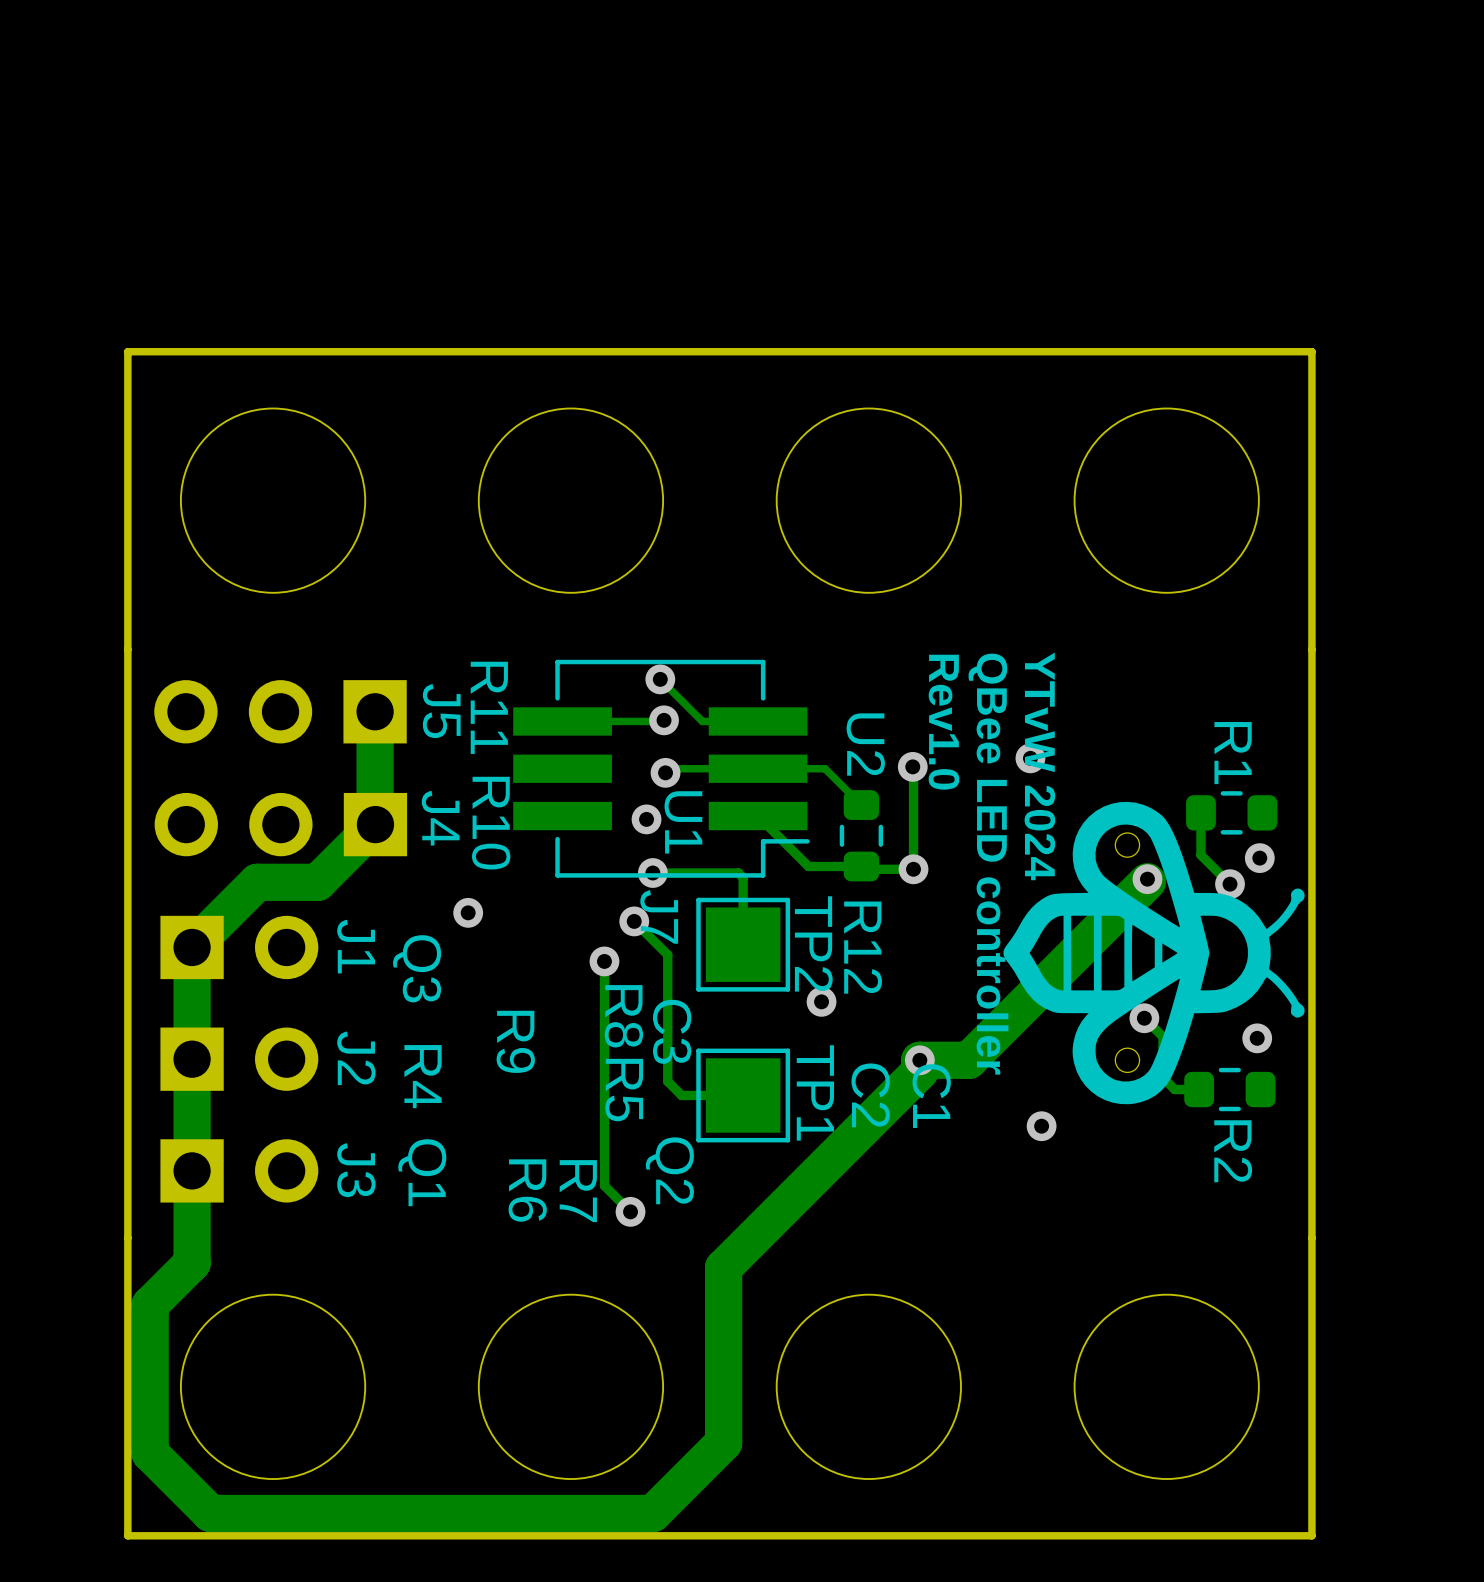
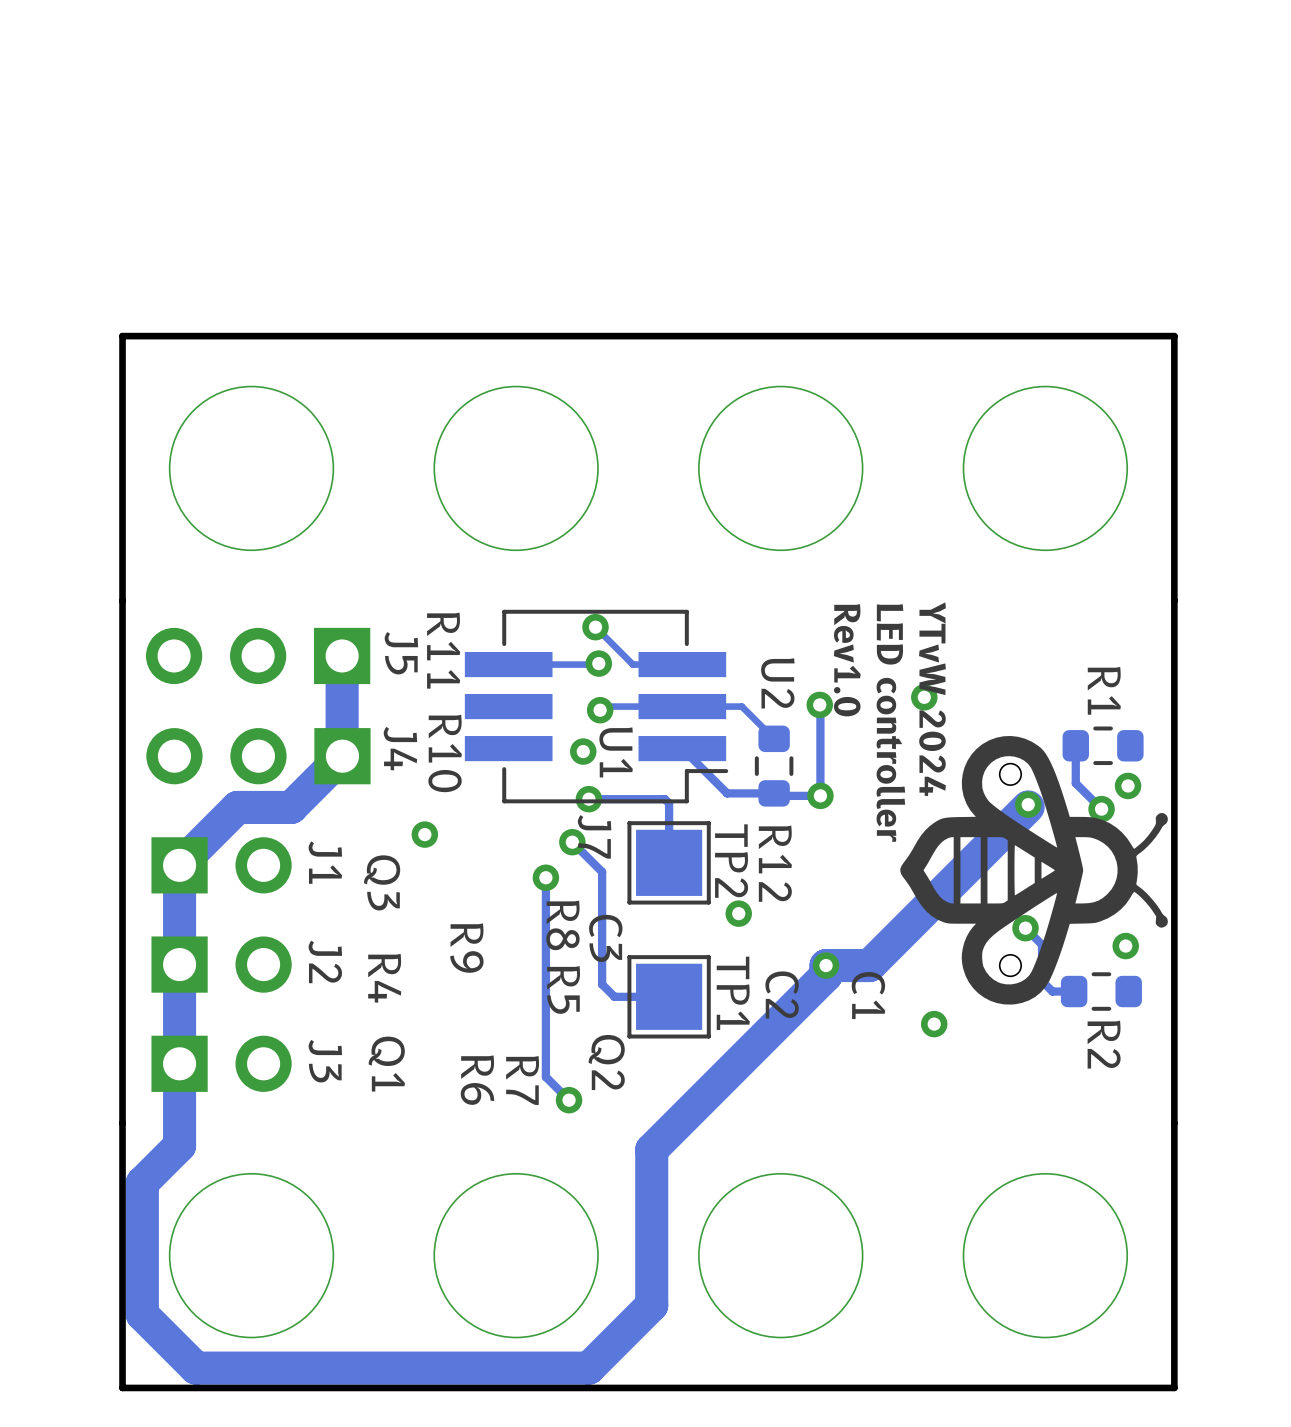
text: QBee LED controller (988, 864) -> LED controller (890, 723)
C1 position: (931, 1096) -> (868, 995)

